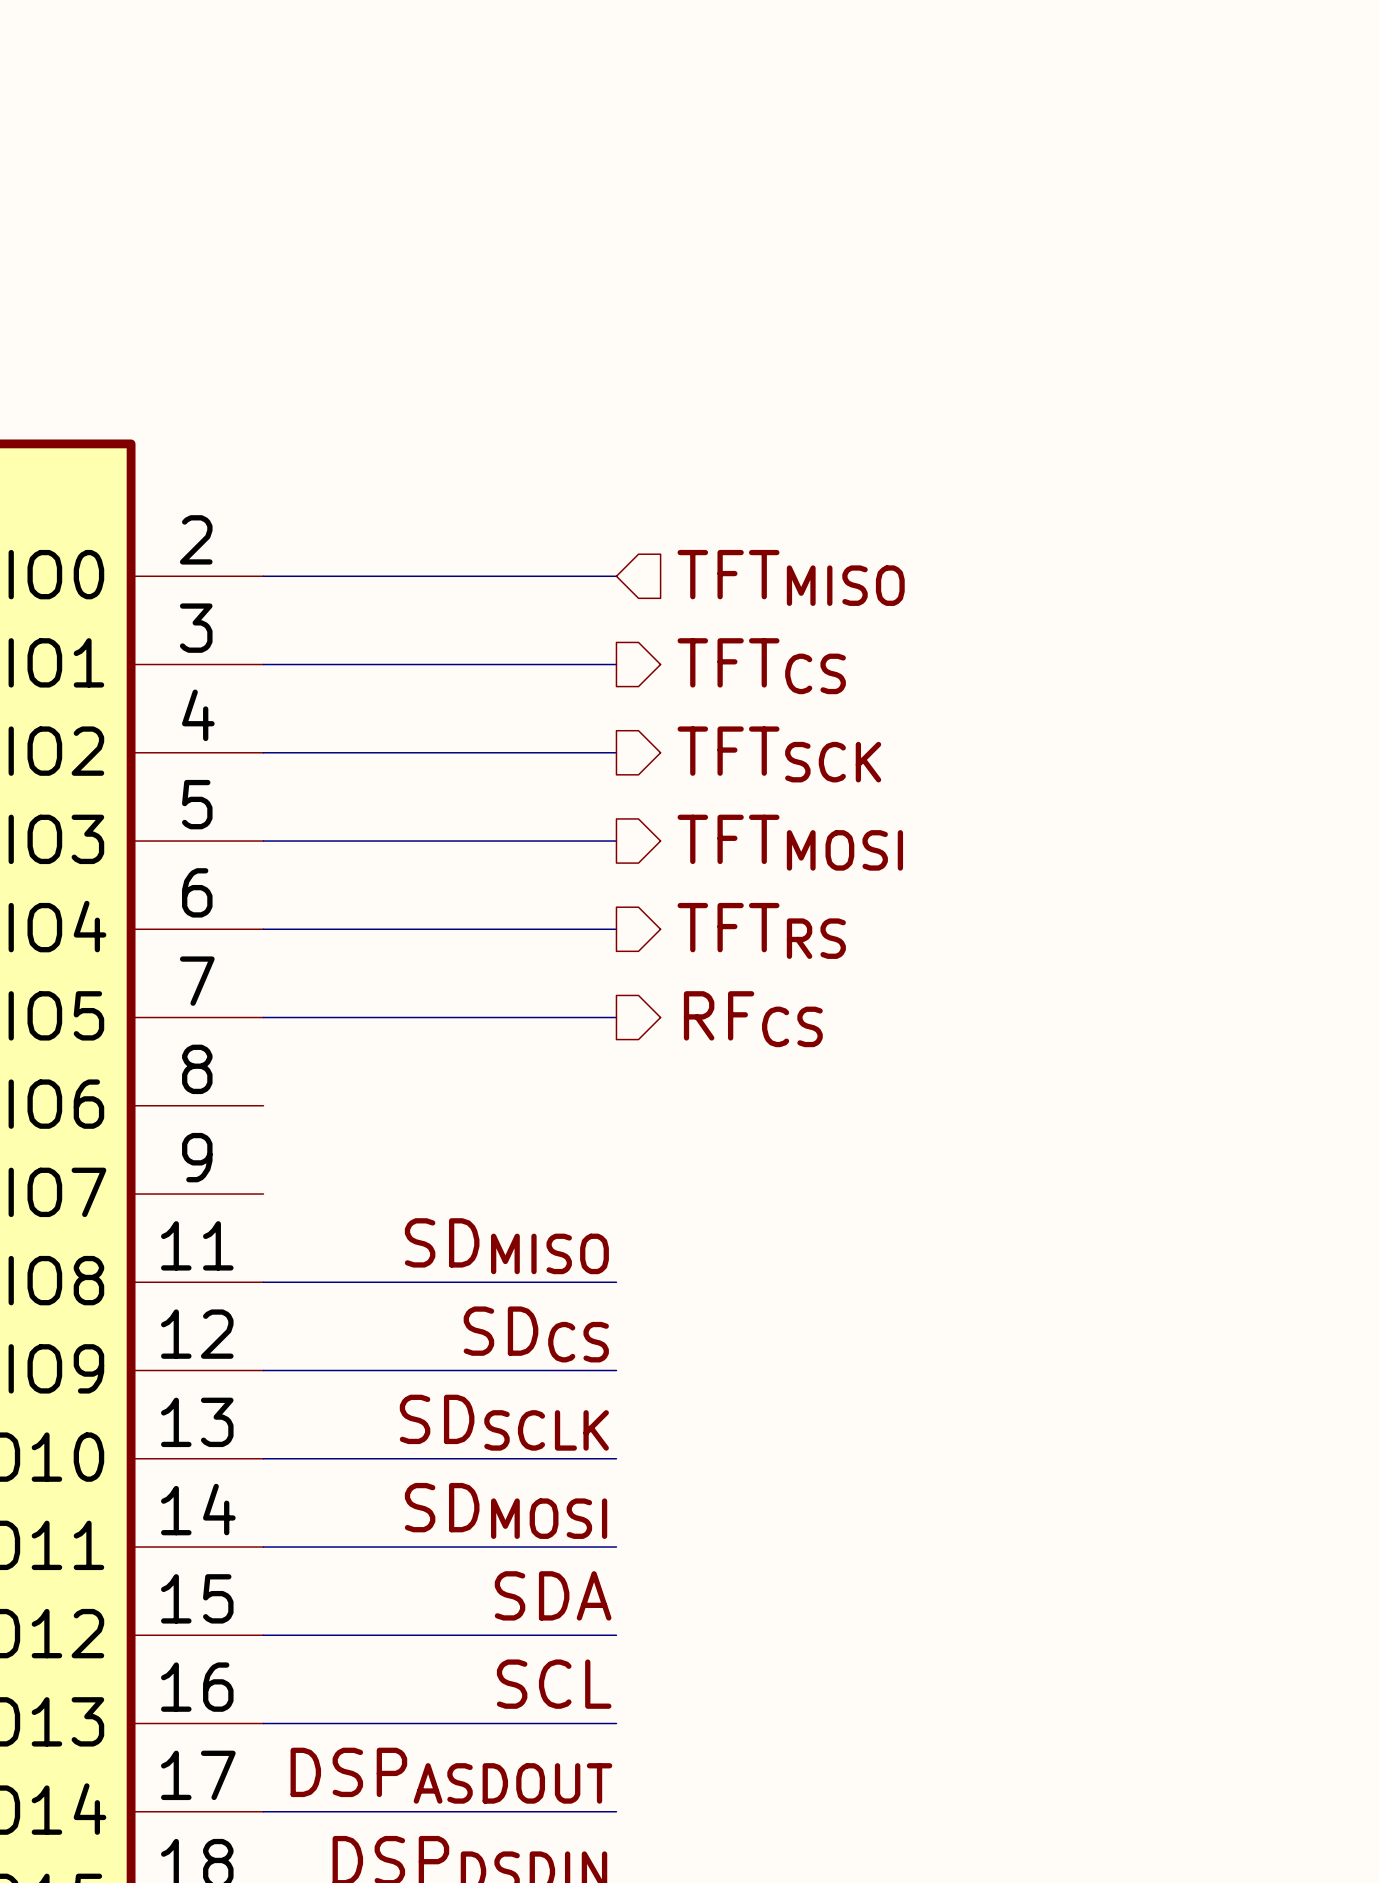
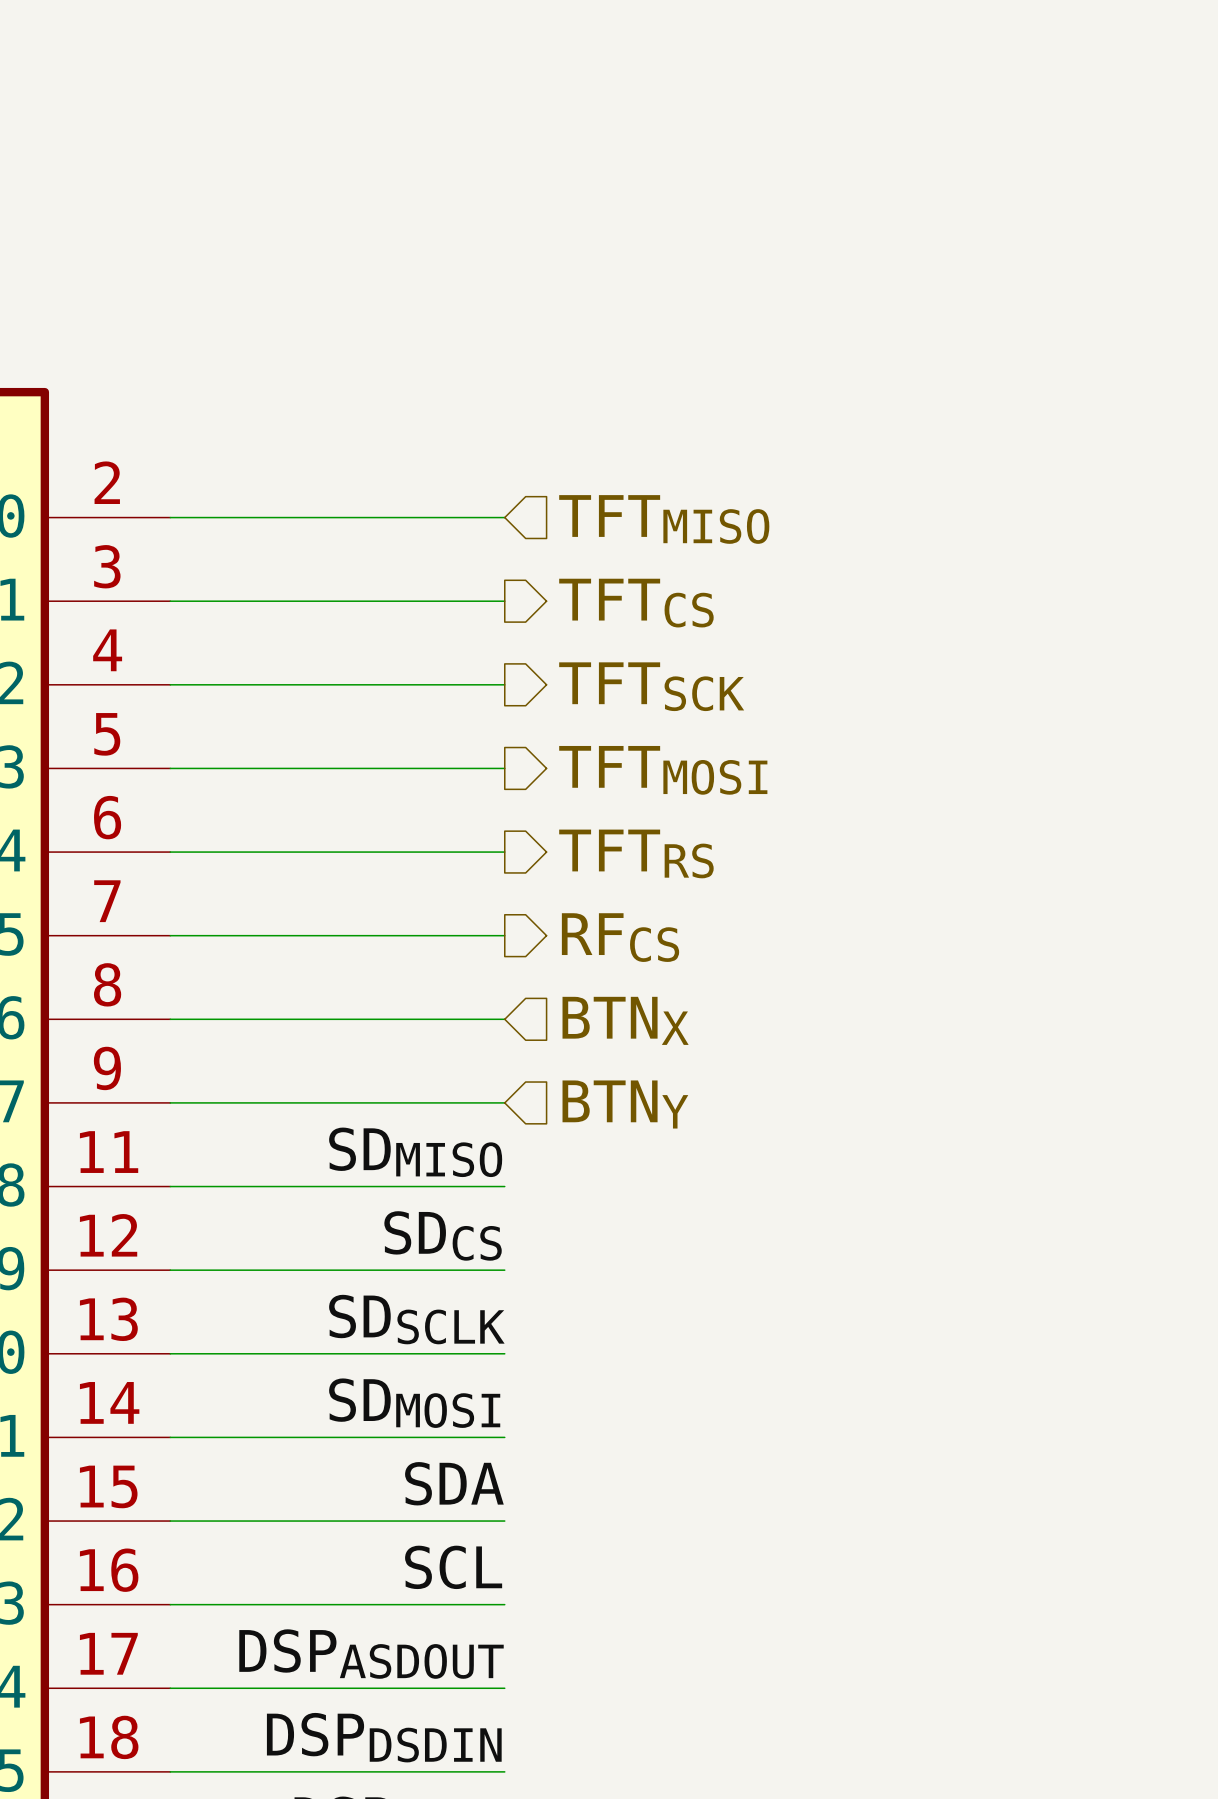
wire: none -> (170, 1019) (504, 1019)
hierarchical label: none -> BTNX (625, 1020)
wire: none -> (170, 1102) (504, 1102)
hierarchical label: none -> BTNY (625, 1104)

